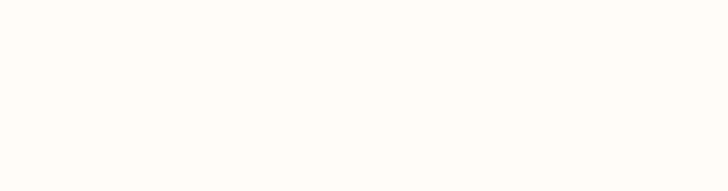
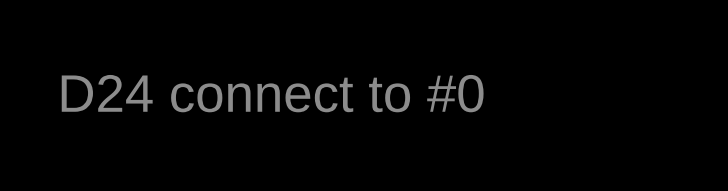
text: none -> D24 connect to #0 (272, 93)

